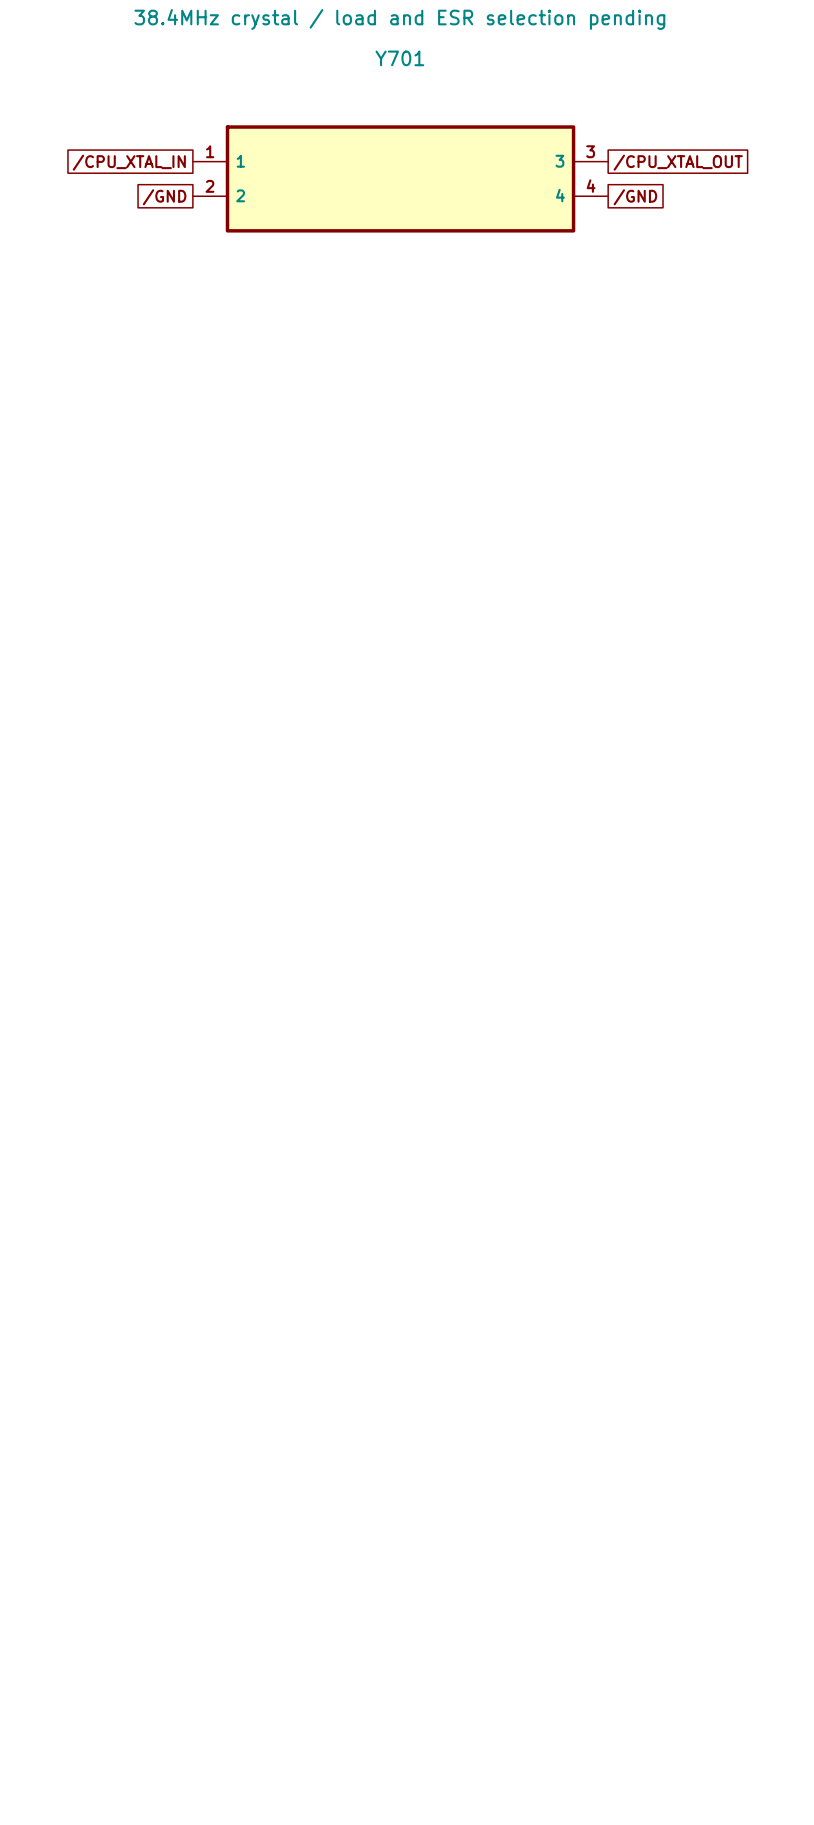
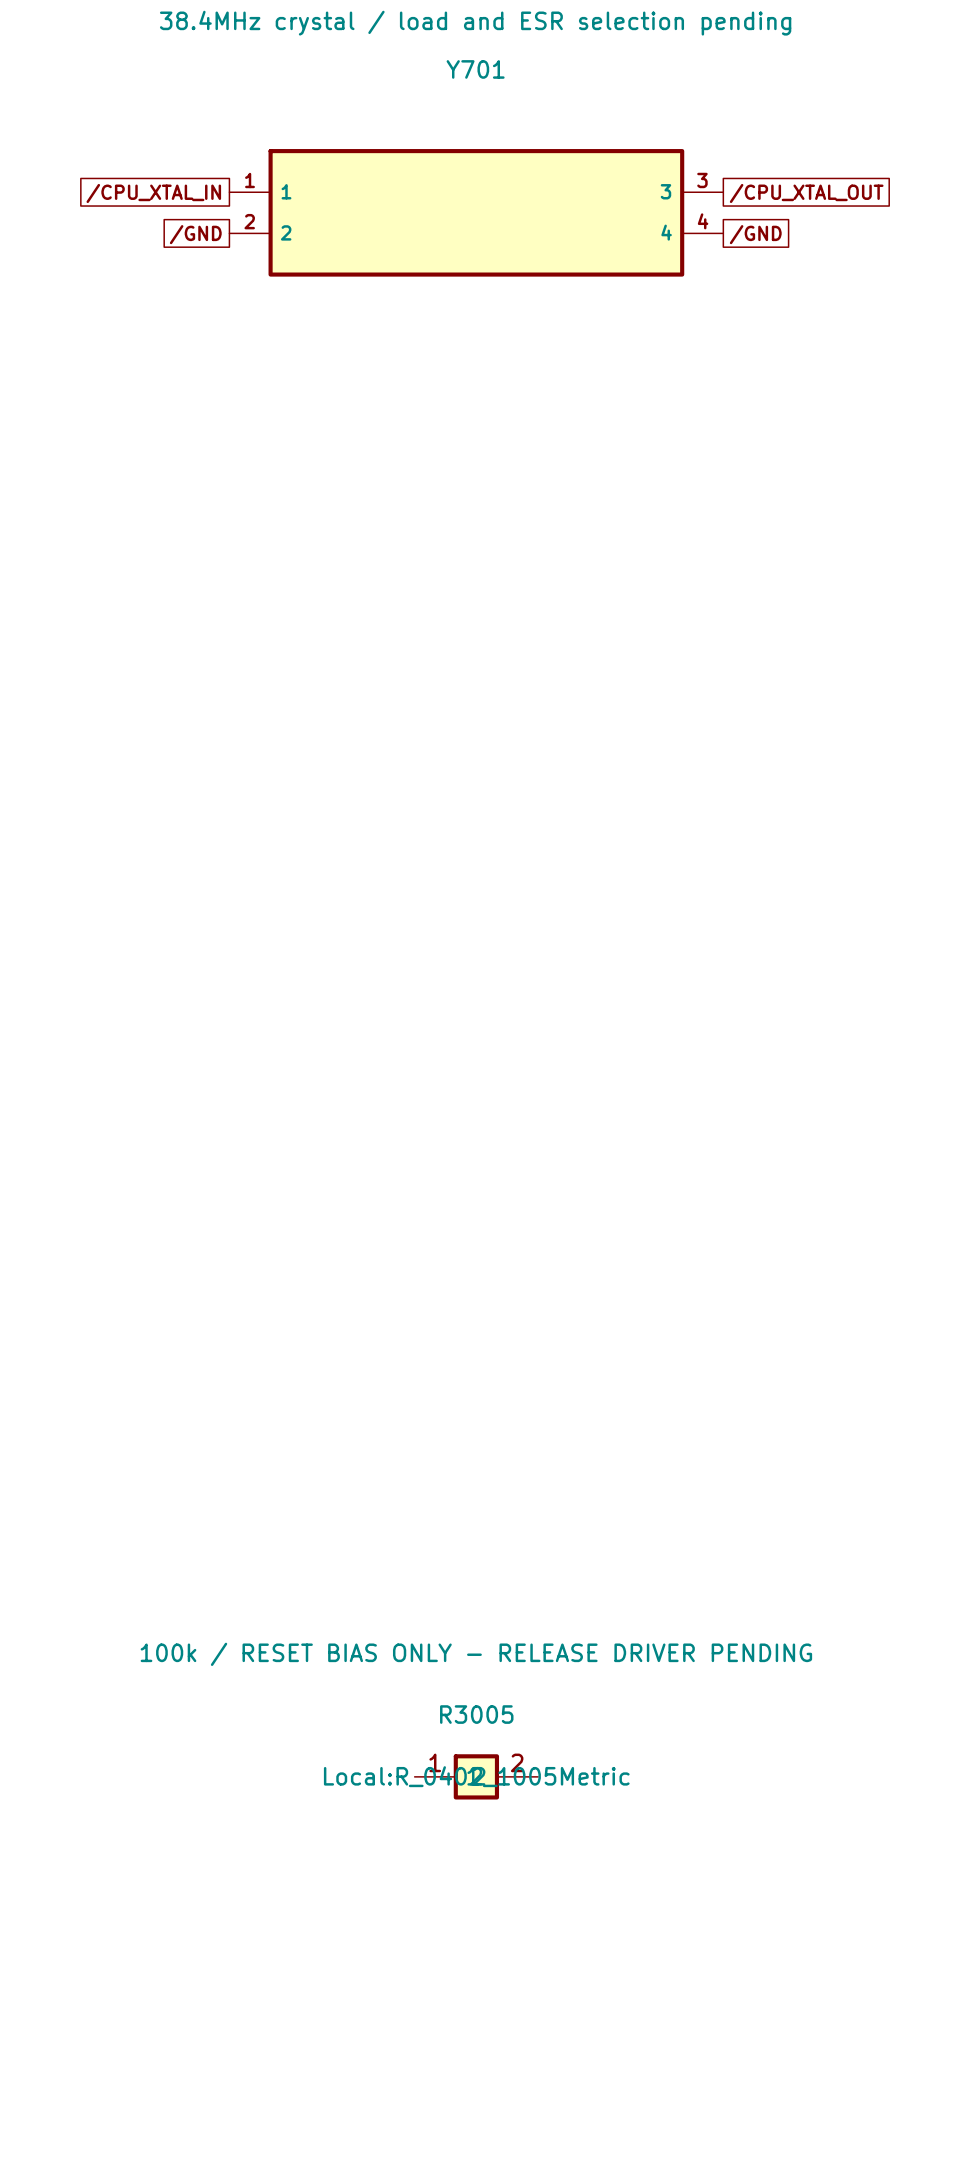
R3005: none -> 100k / RESET BIAS ONLY - RELEASE DRIVER PENDING (476, 1776)

